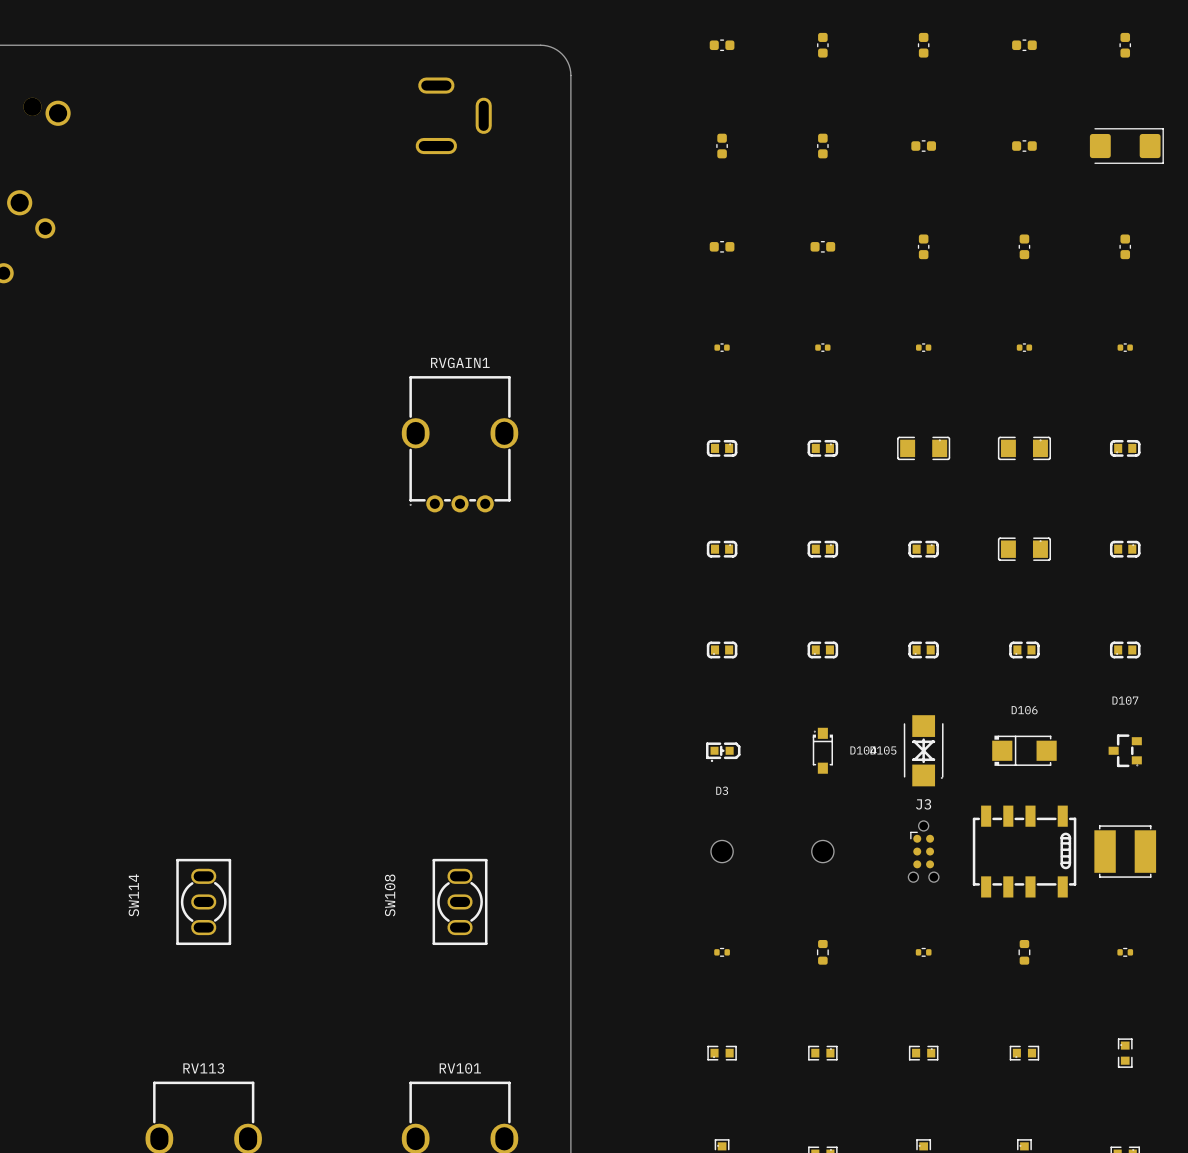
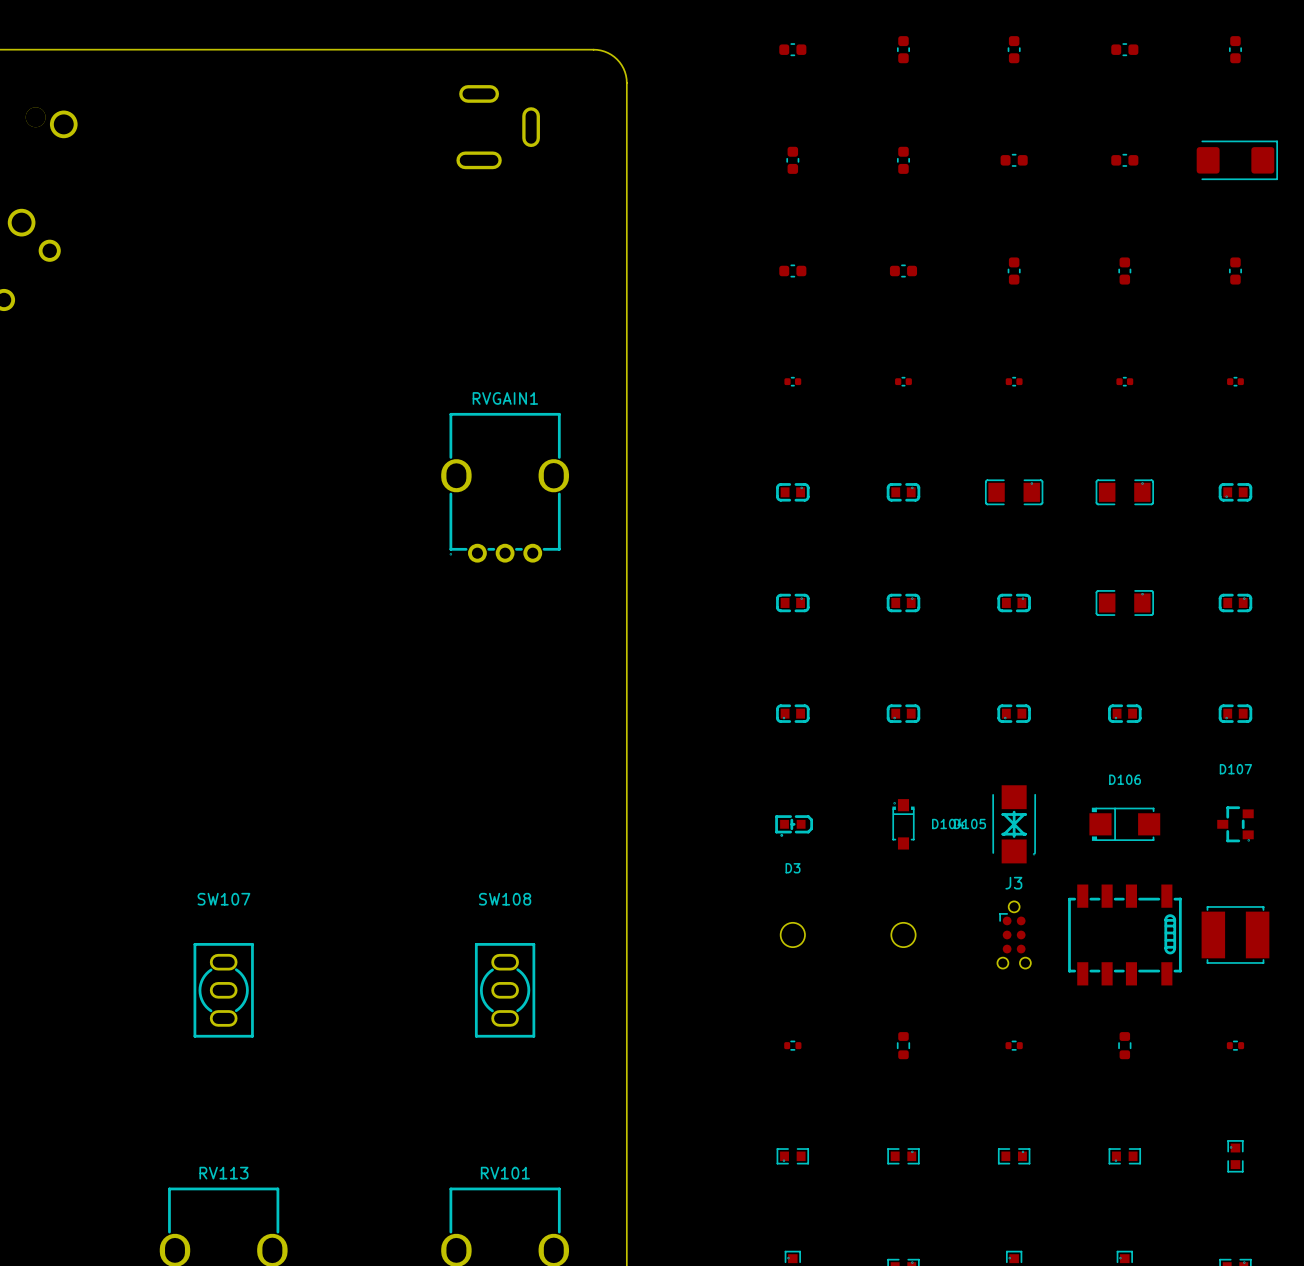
SW114 name: SW114 (133, 895) -> SW107 (223, 899)
SW108 name rotation: 0° (390, 895) -> 90° clockwise (505, 899)
SW108 name position: SW108 (390, 895) -> SW108 (505, 899)

